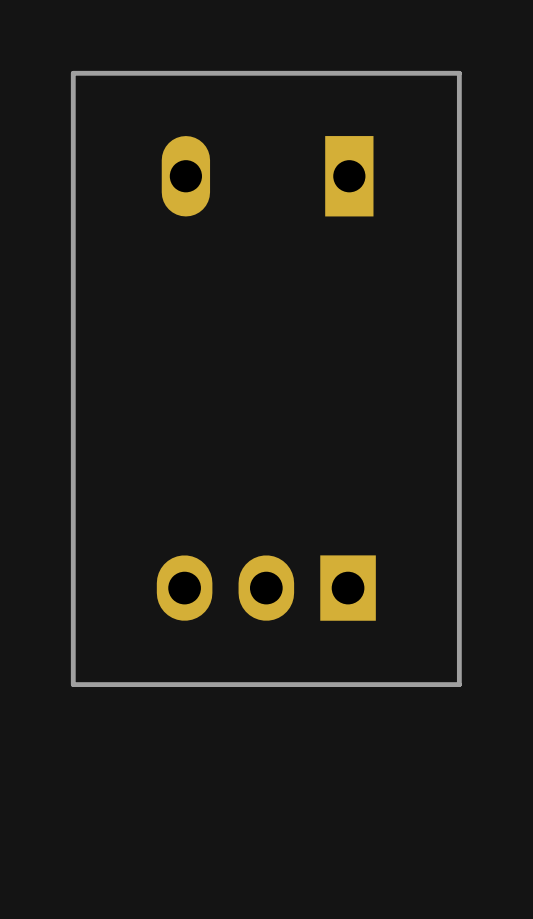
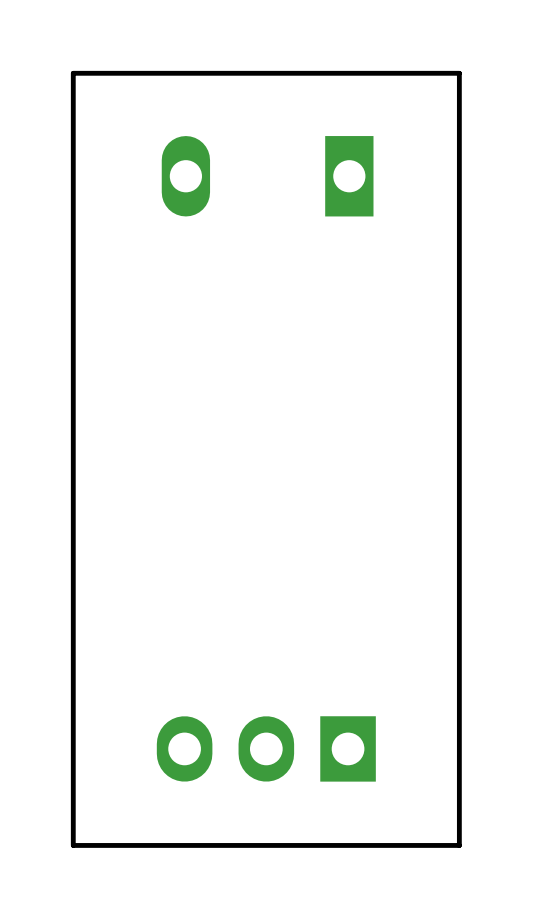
part position: (266, 588) -> (266, 748)
board edge: (459, 684) (73, 684) -> (459, 684) (459, 845) (73, 845) (73, 684)

